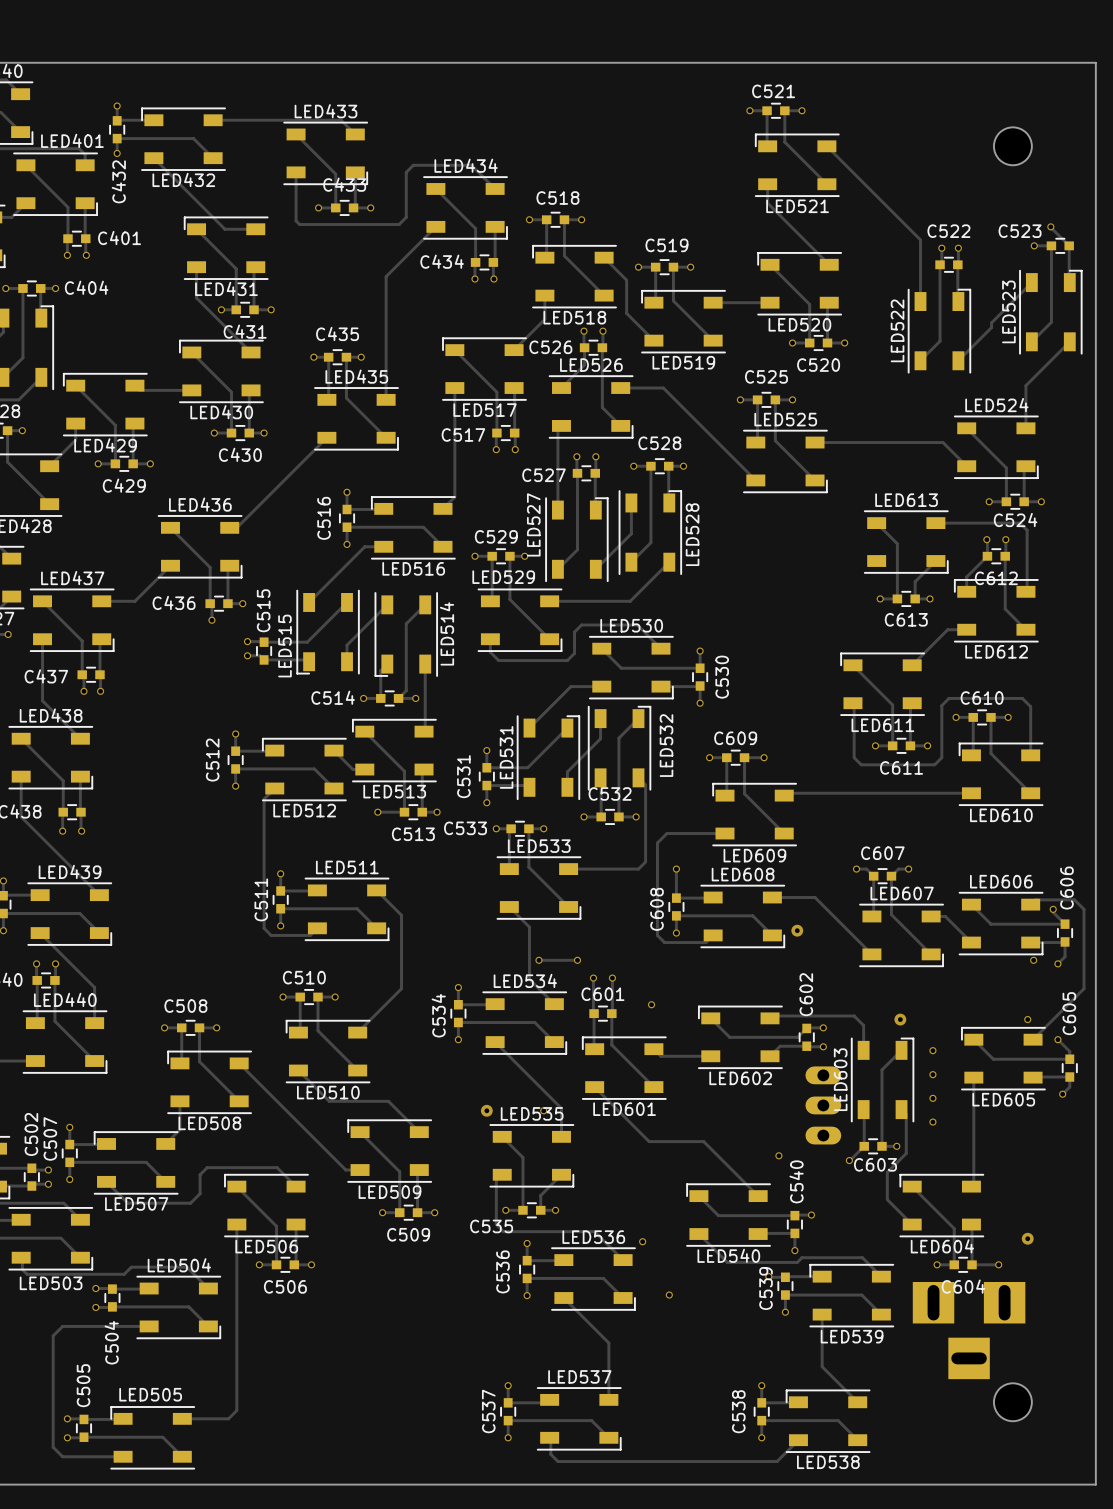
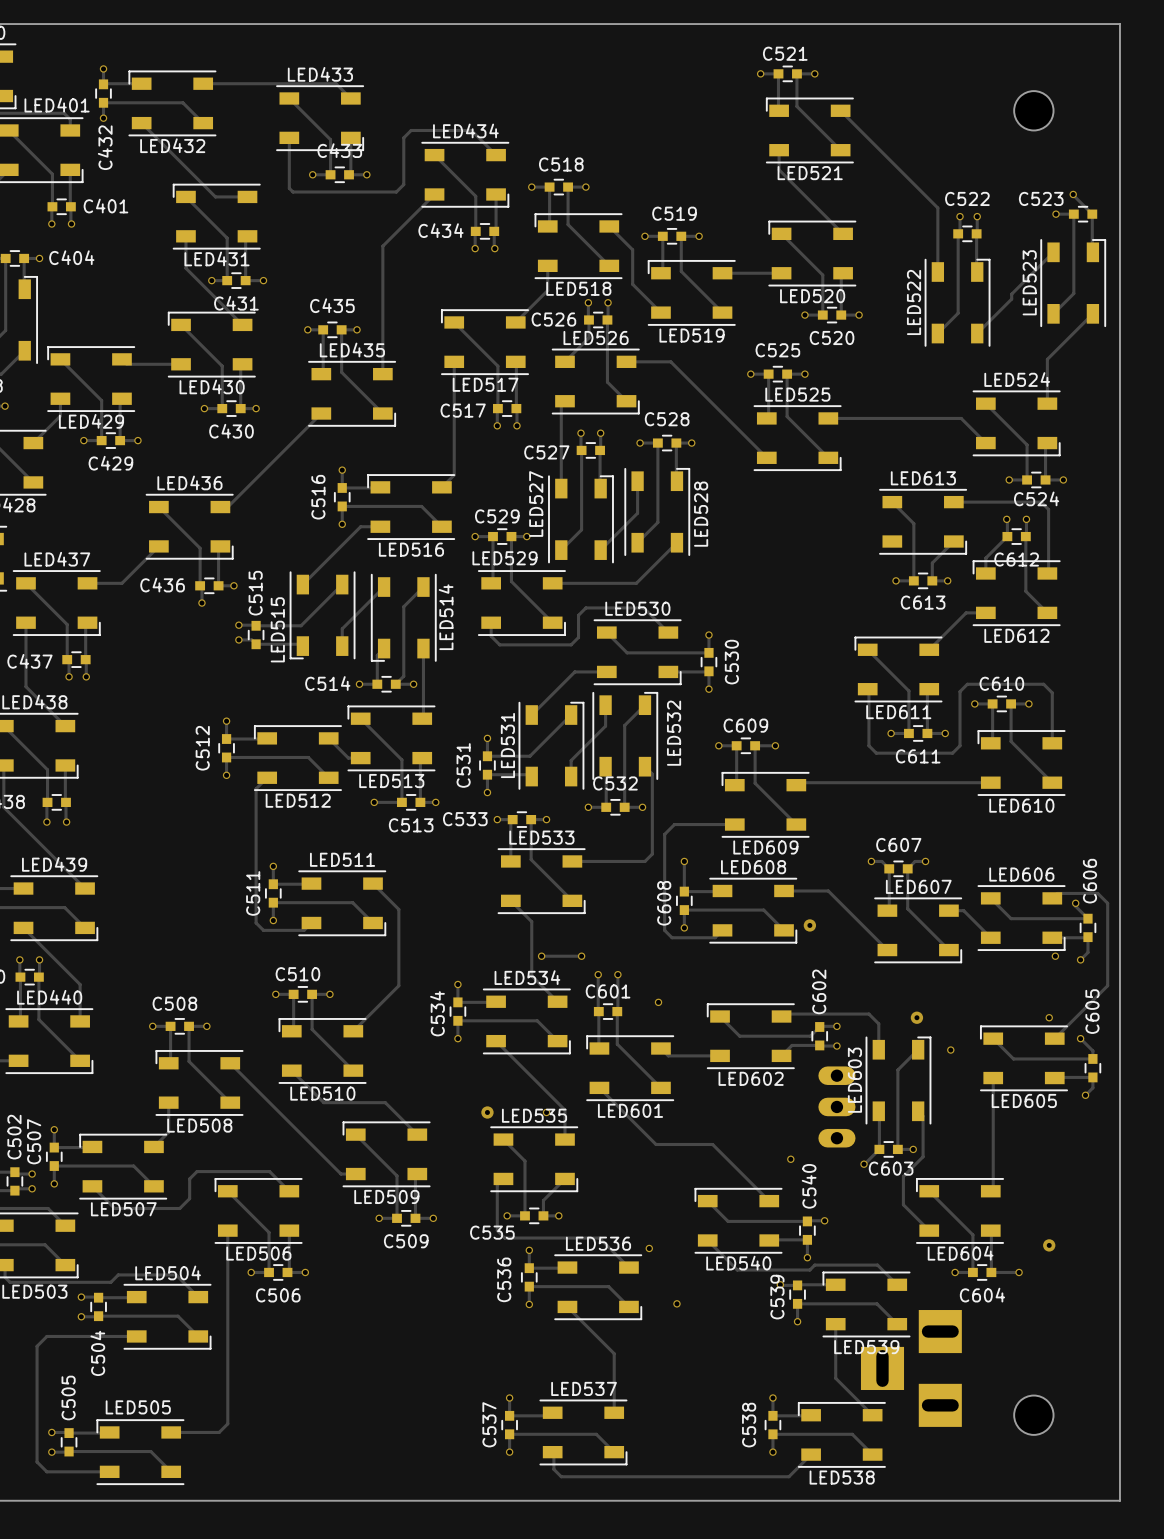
via: (932, 1074) -> none
via: (932, 1098) -> none
via: (932, 1122) -> none
part rotation: 0° (969, 1330) -> 90° clockwise (911, 1368)
part position: (969, 1330) -> (911, 1368)

